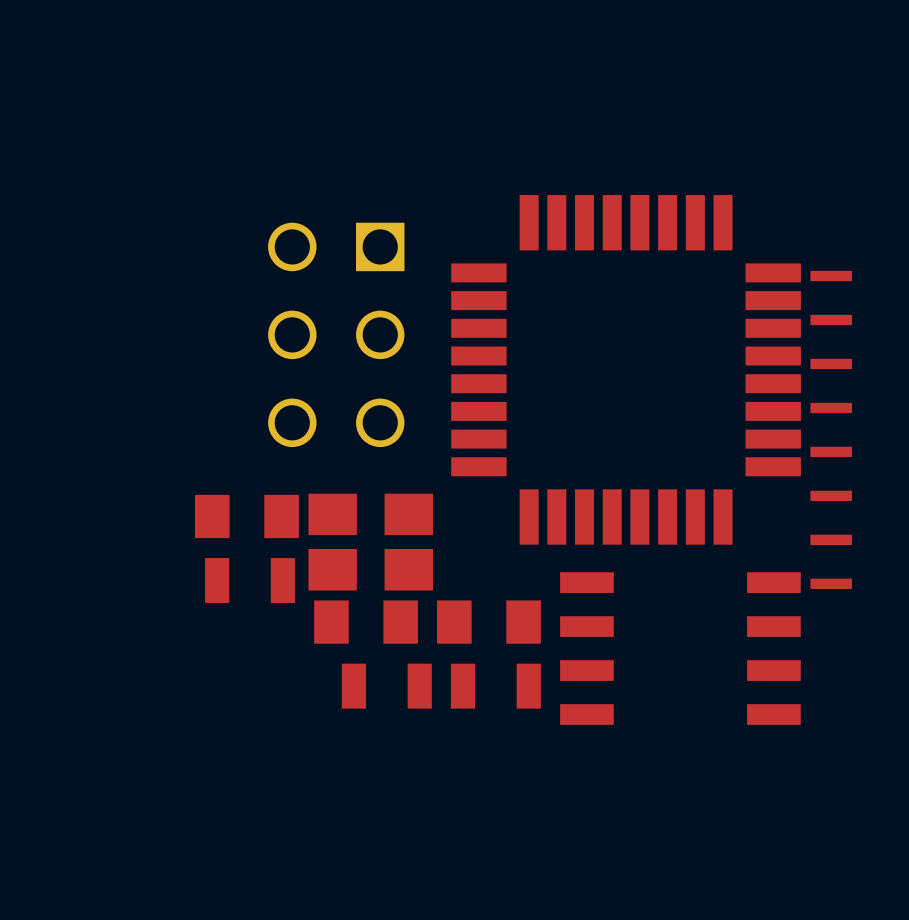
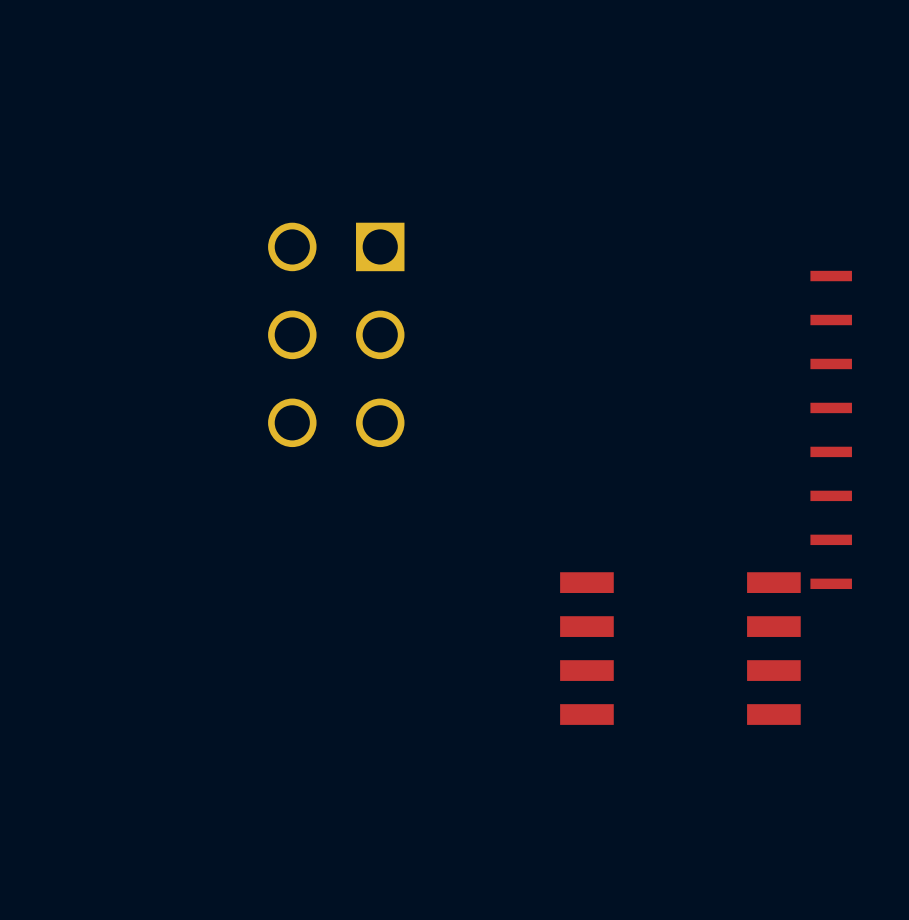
part: (626, 369) -> none
part: (246, 516) -> none
part: (370, 542) -> none
part: (250, 580) -> none
part: (366, 622) -> none
part: (488, 622) -> none
part: (386, 686) -> none
part: (495, 686) -> none

